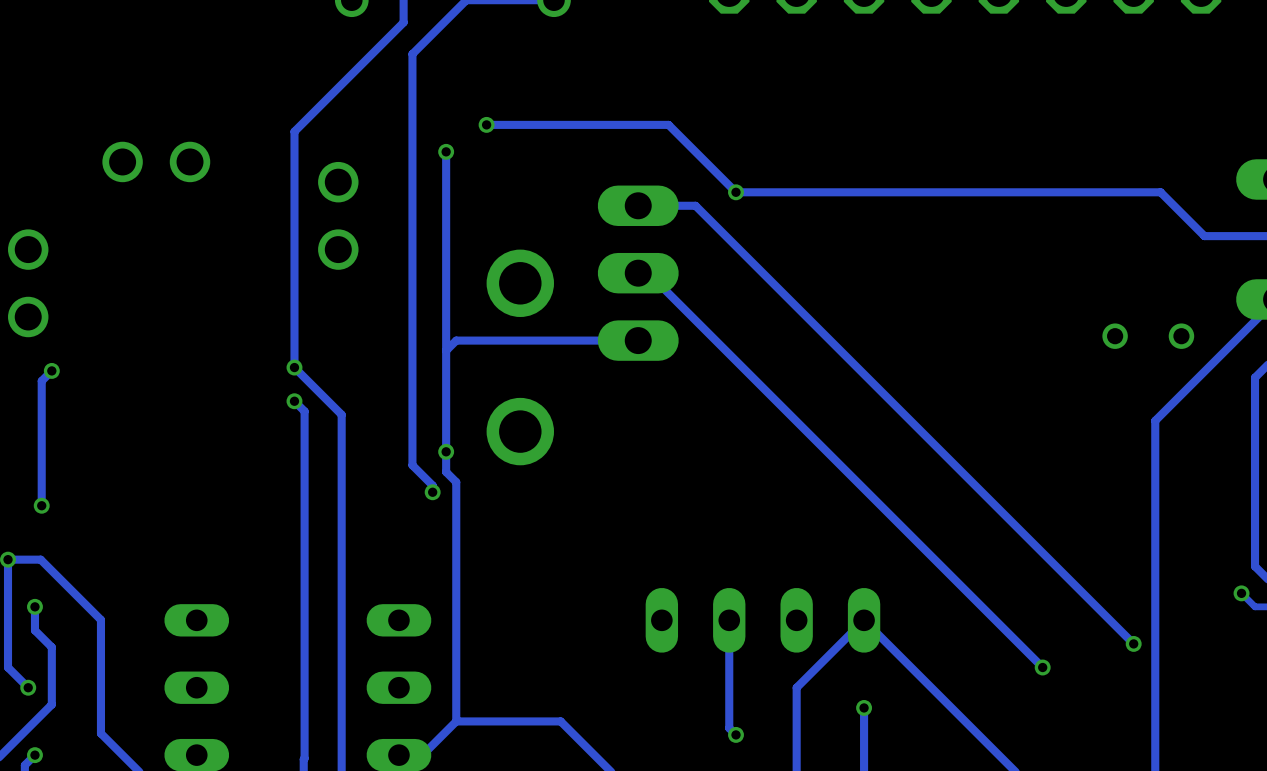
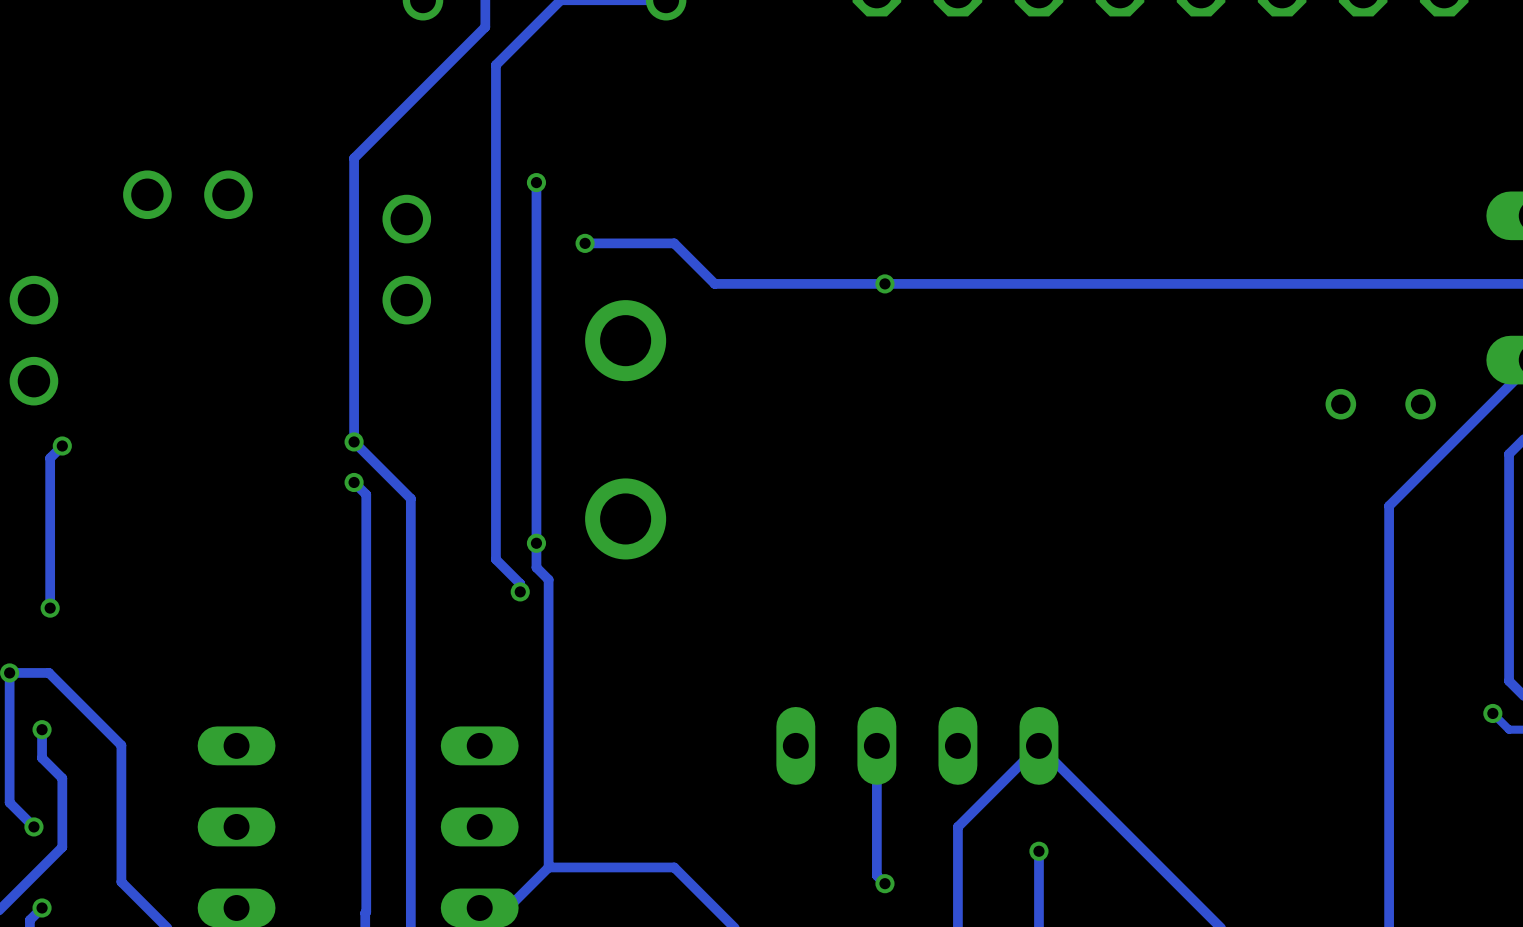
track: (486, 124) (668, 124) (735, 192) (1160, 192) (1204, 236) -> (585, 243) (674, 243) (714, 283) (1448, 283)
via position: (486, 124) -> (585, 243)
via position: (735, 192) -> (884, 283)
track: (638, 205) (695, 205) (1133, 643) -> none
track: (638, 273) (648, 273) (1042, 667) -> none
part: (638, 273) -> none
track: (638, 340) (456, 340) (446, 350) -> none
via: (1133, 643) -> none
via: (1042, 667) -> none

